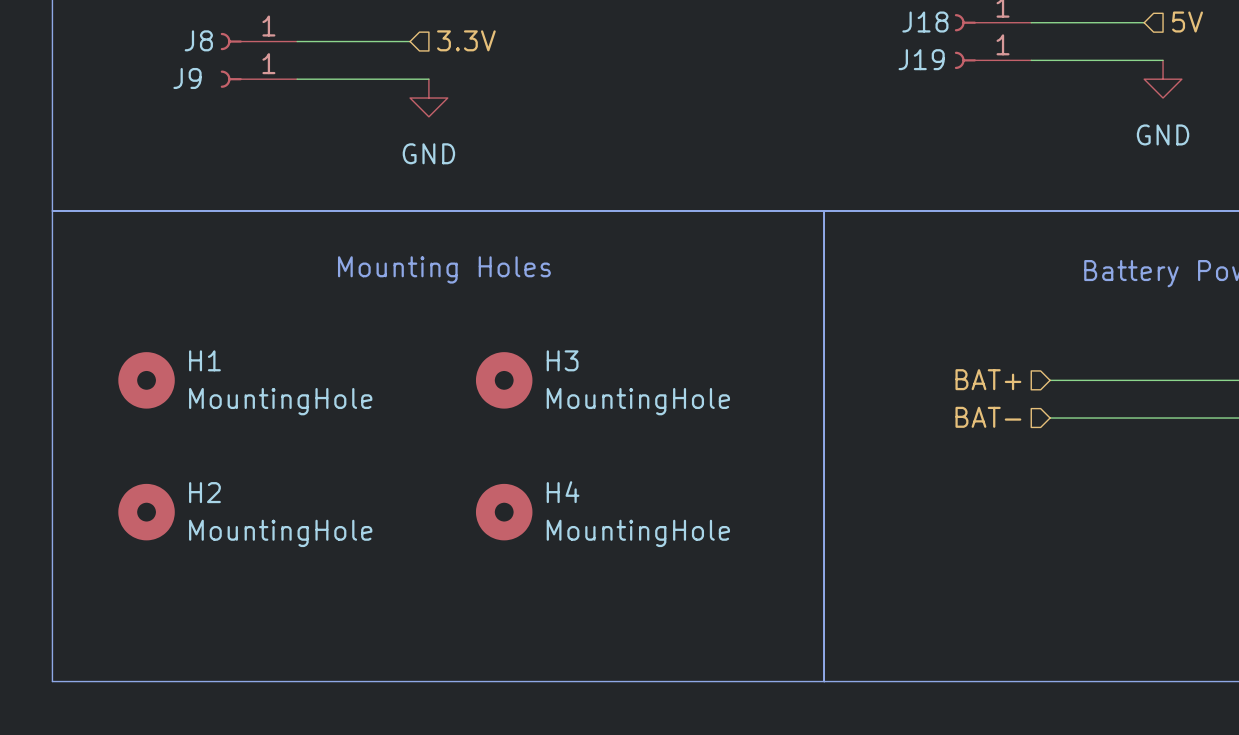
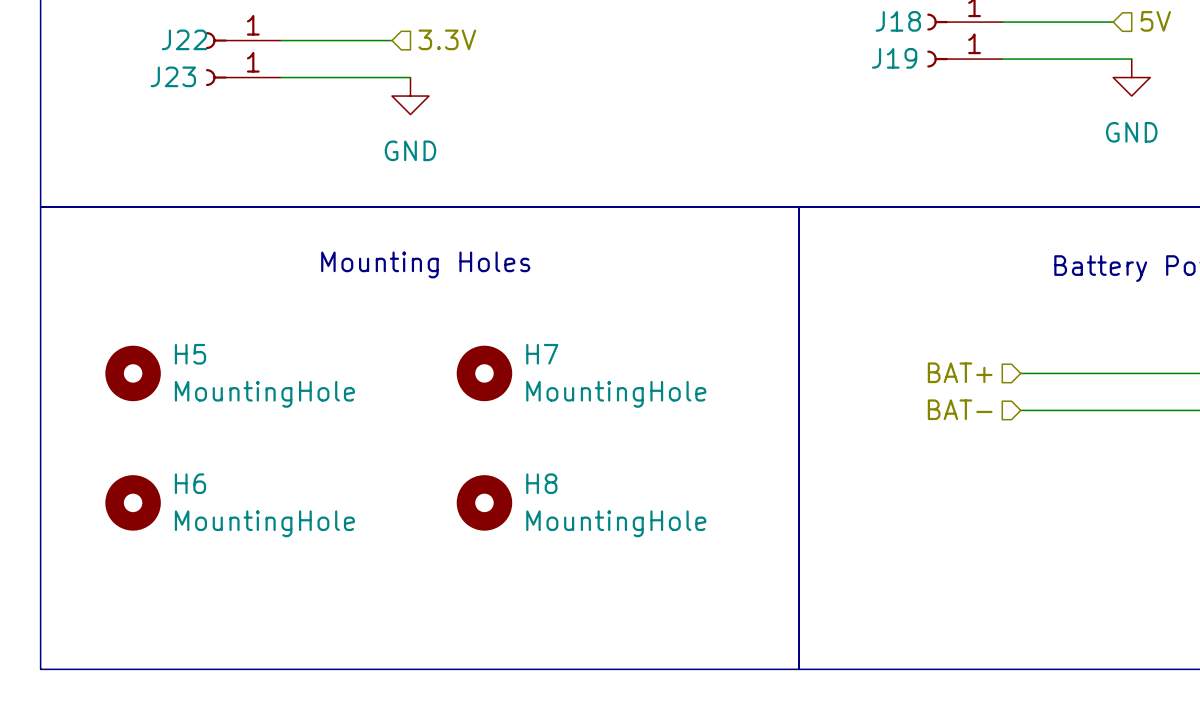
J8 name: J8 (198, 40) -> J22 (184, 39)
J9 name: J9 (187, 78) -> J23 (173, 76)
H1 name: H1 (204, 360) -> H5 (190, 354)
H3 name: H3 (562, 360) -> H7 (542, 354)
H2 name: H2 (204, 492) -> H6 (190, 483)
H4 name: H4 (563, 492) -> H8 (541, 483)

